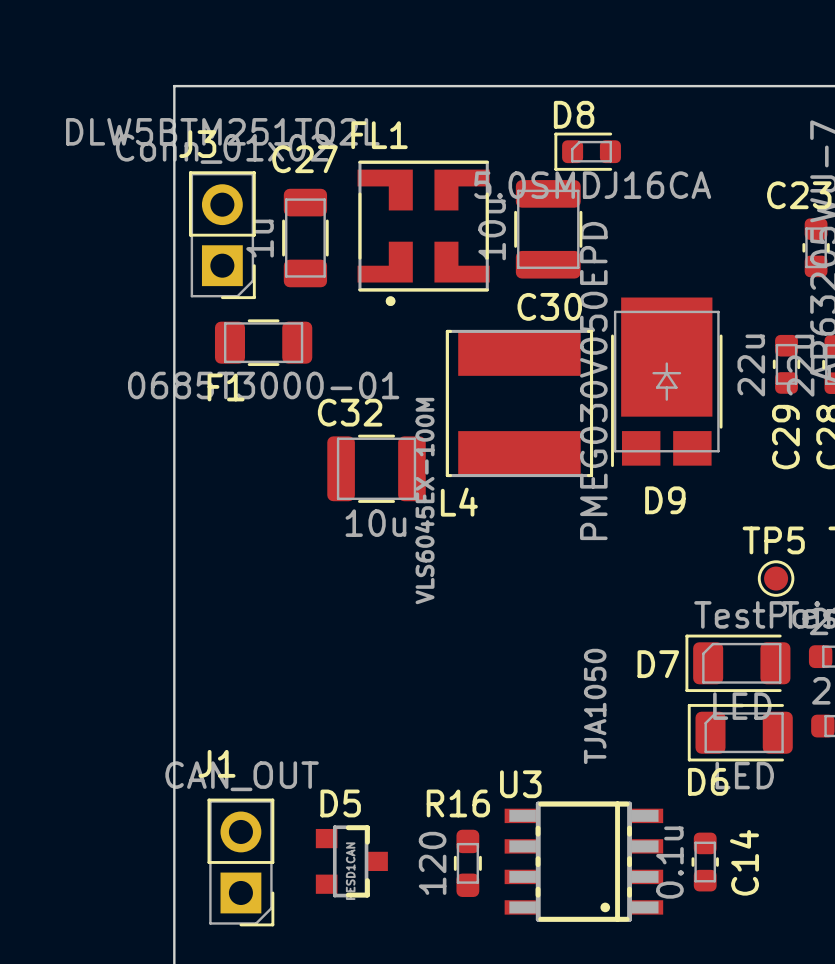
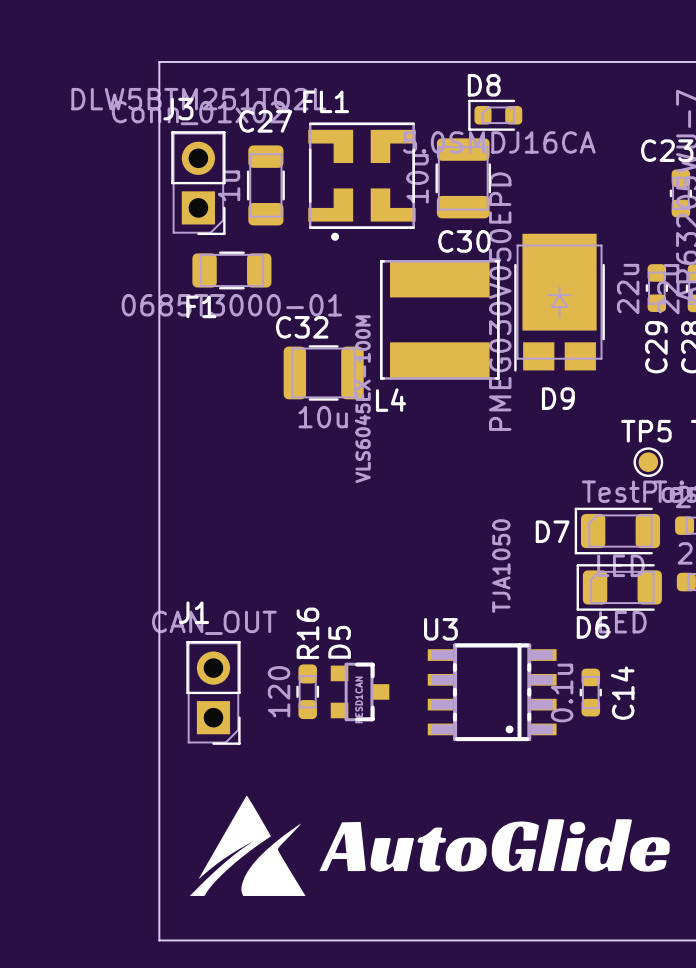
D5 name rotation: 0° (340, 803) -> 90° counterclockwise (339, 642)
R16 name rotation: 0° (458, 803) -> 90° counterclockwise (307, 633)
D5 position: (351, 861) -> (360, 691)
R16 position: (467, 863) -> (307, 691)

